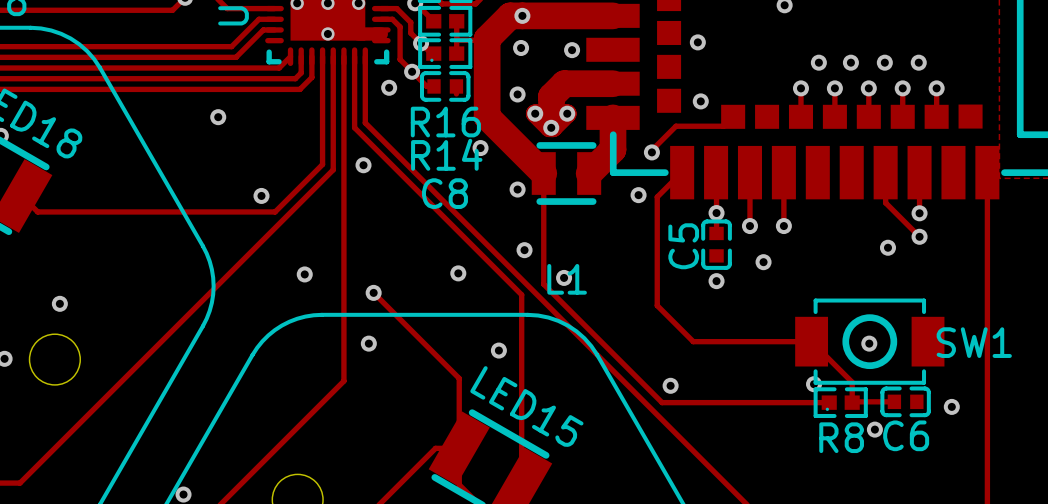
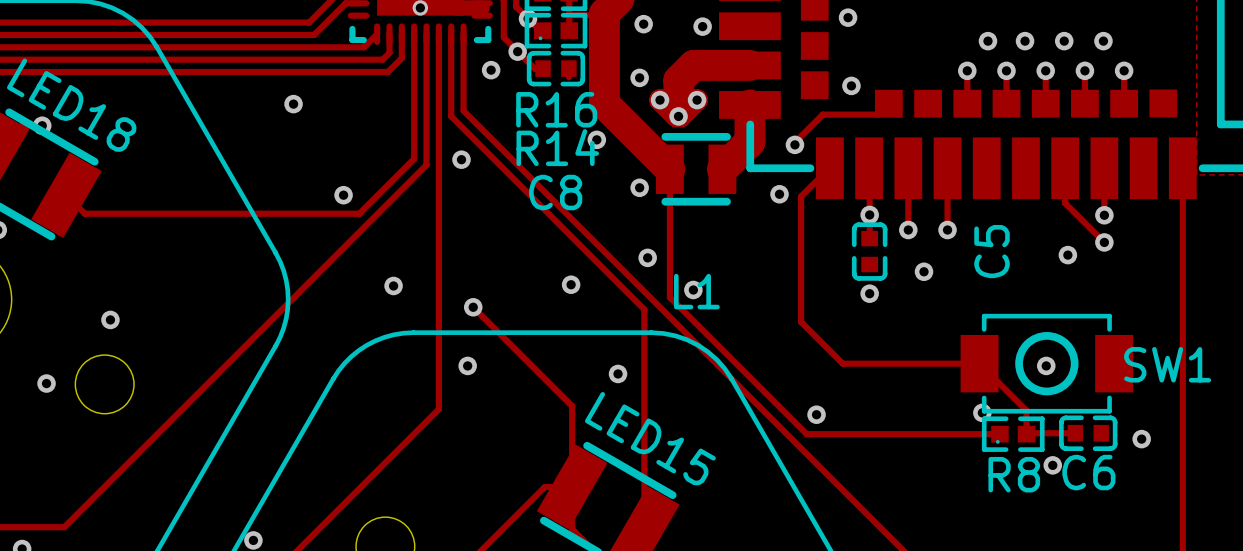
C5 name position: C5 (683, 246) -> C5 (992, 251)

